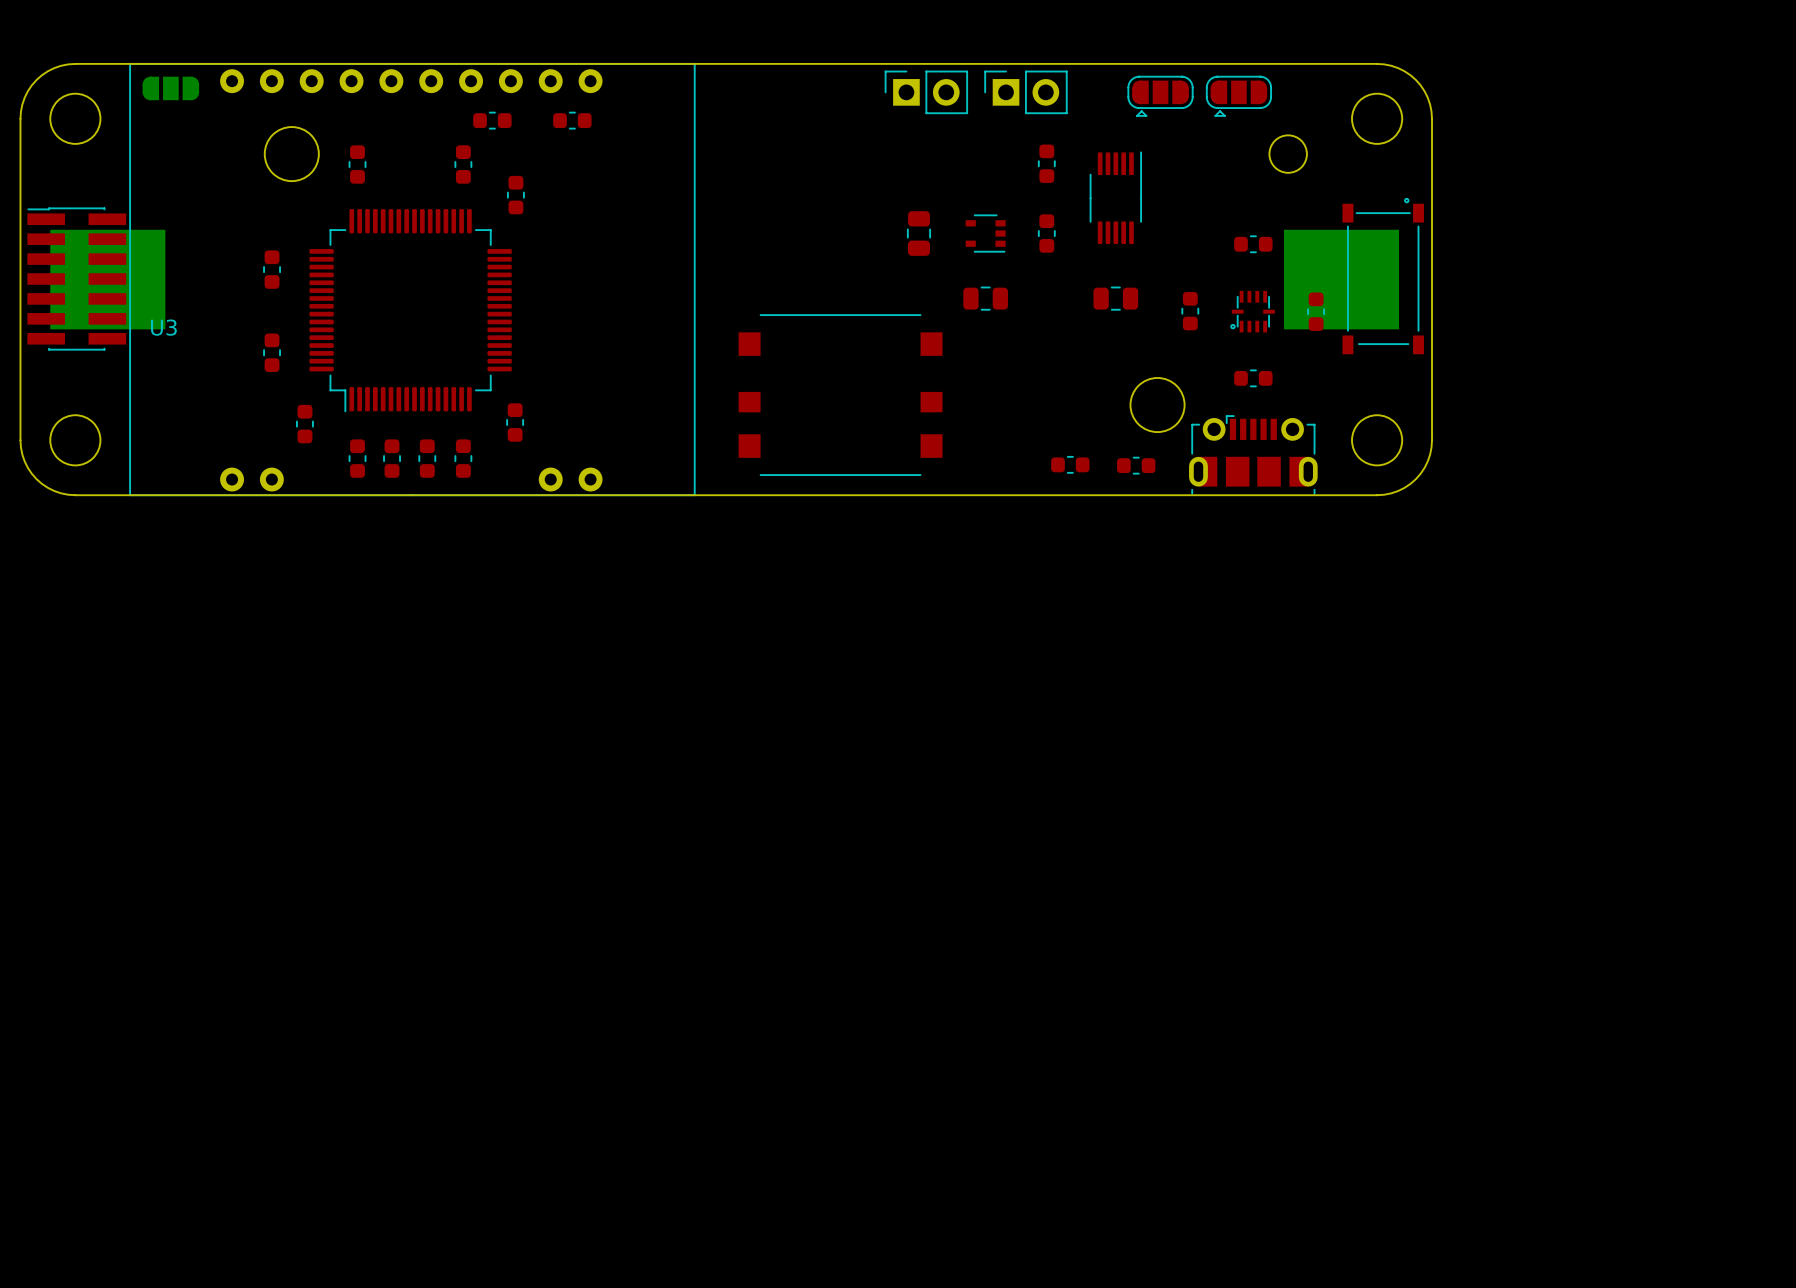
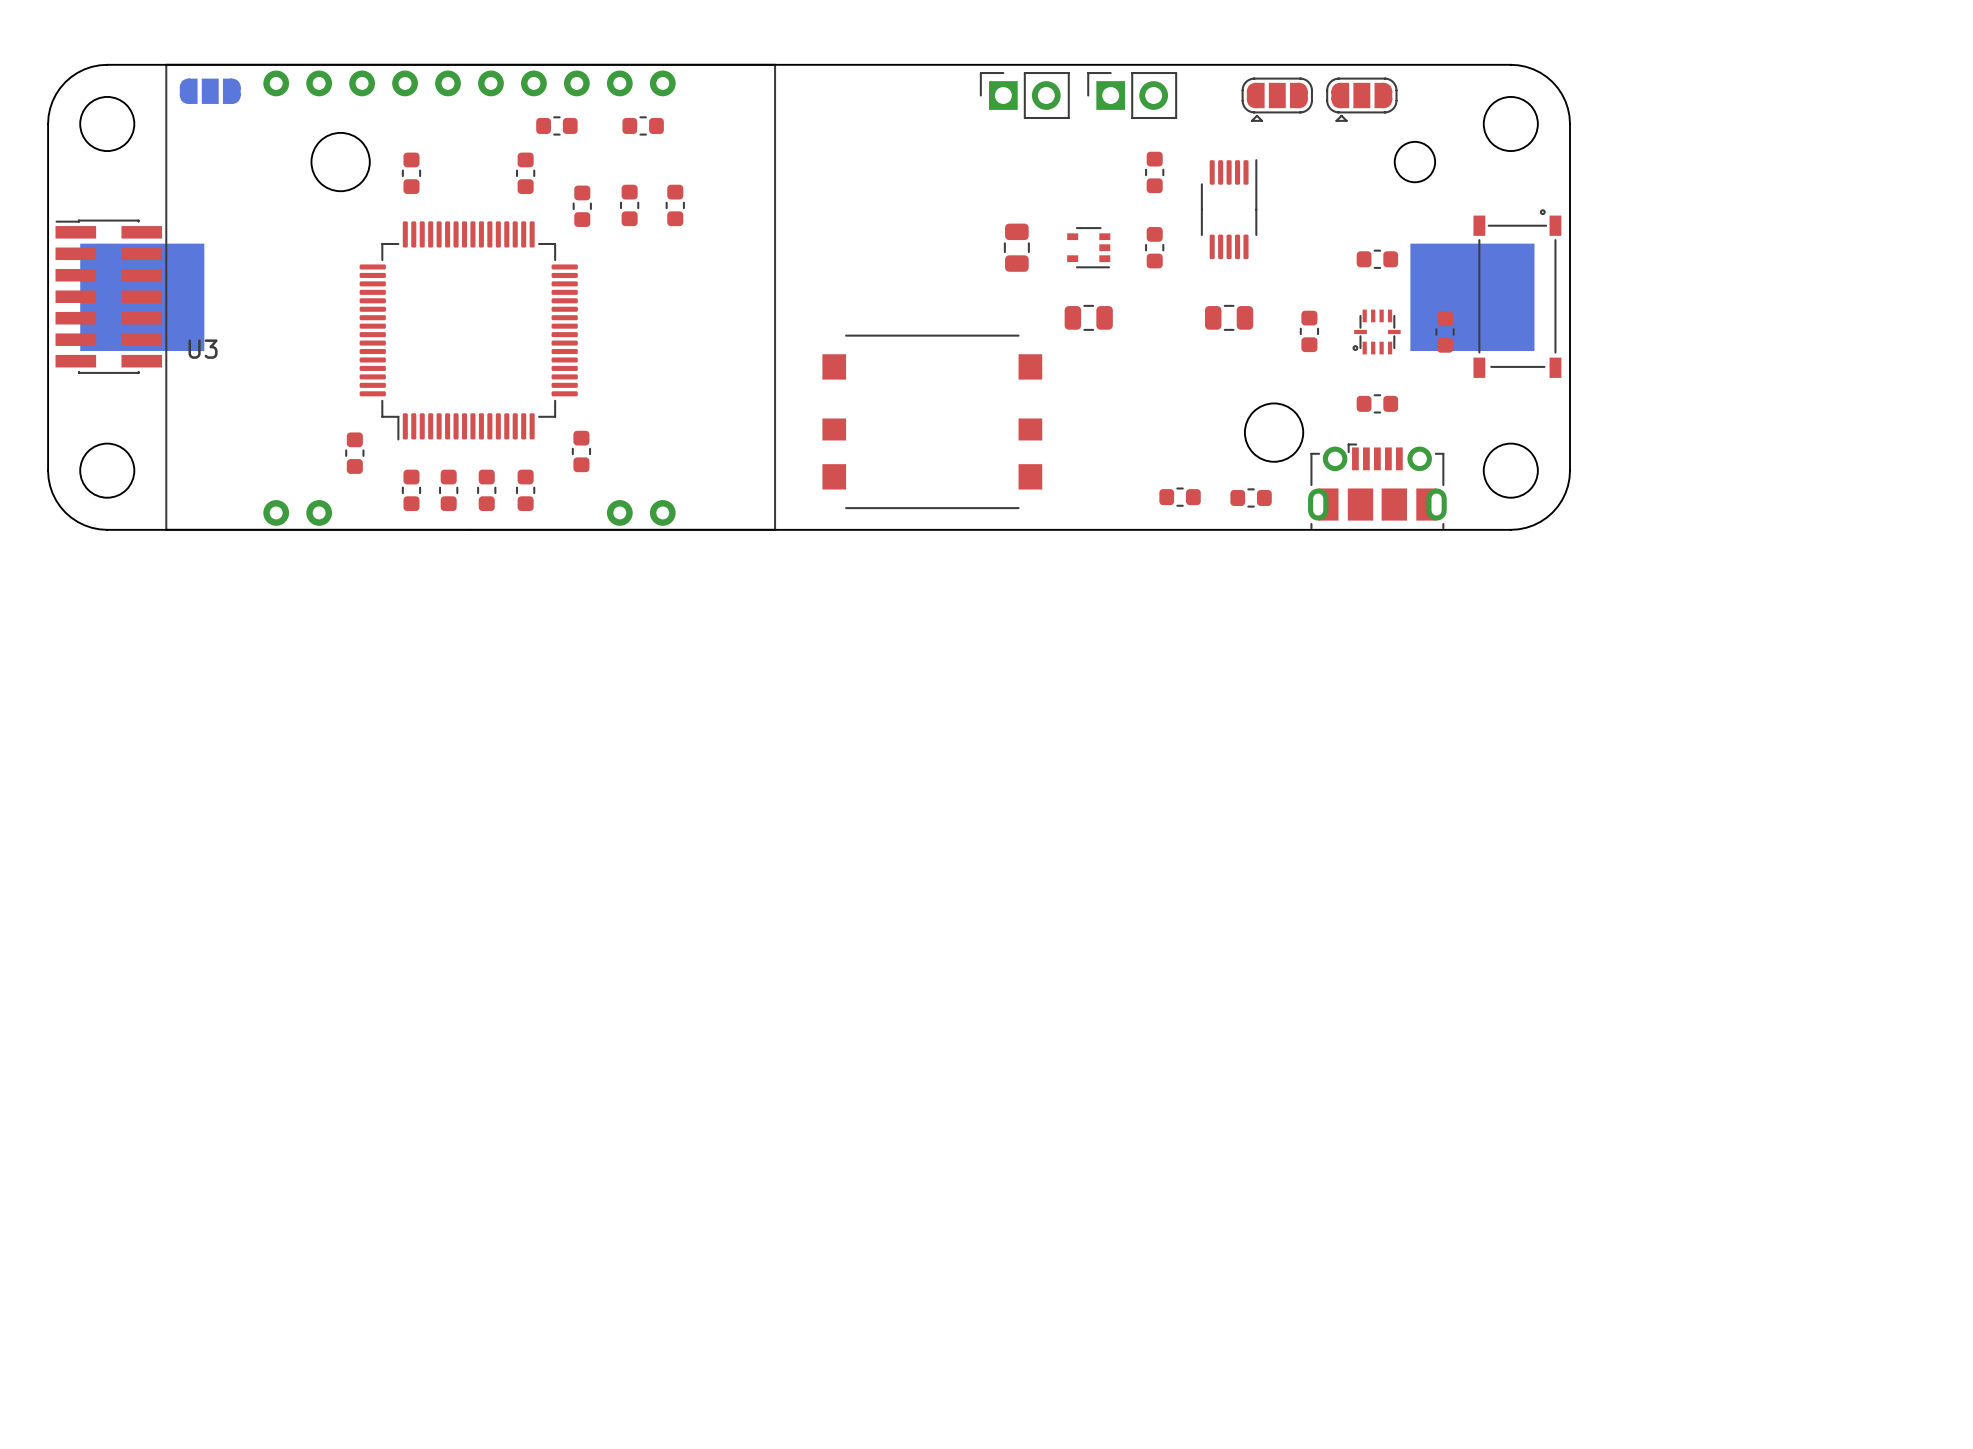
part: none -> (629, 205)
part: none -> (675, 205)
part: (272, 269) -> none
part: (272, 352) -> none

